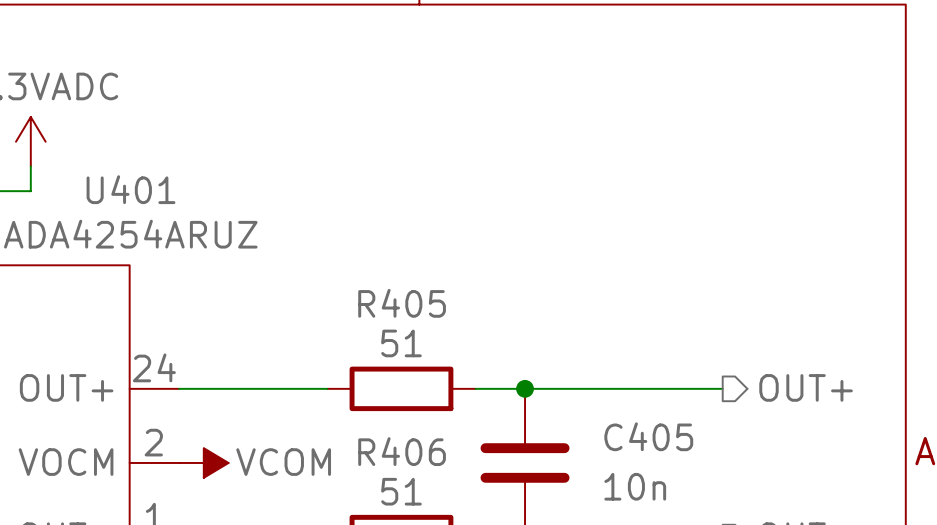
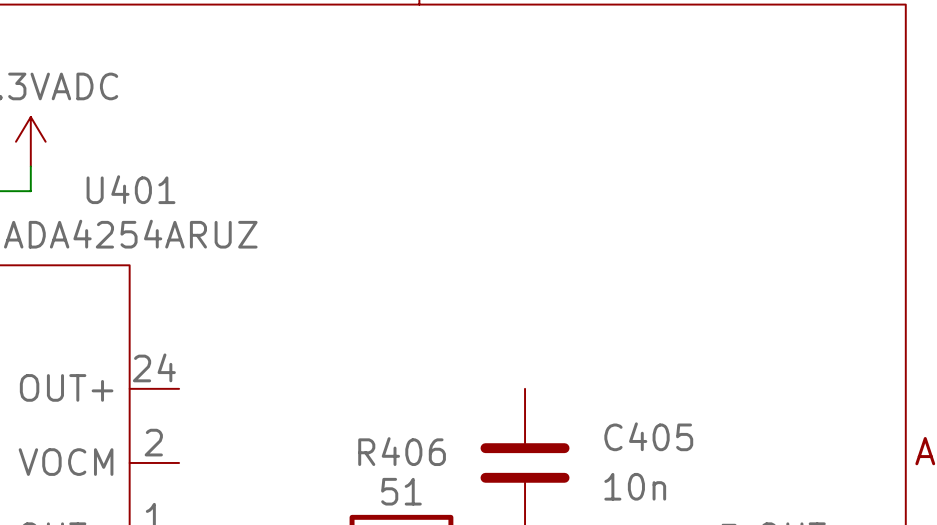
hierarchical label: OUT+ (806, 387) -> none
wire: (179, 388) (327, 388) -> none
R405: 51 (401, 388) -> none
wire: (475, 388) (722, 388) -> none
junction: (525, 388) -> none
power symbol: VCOM (203, 462) -> none

